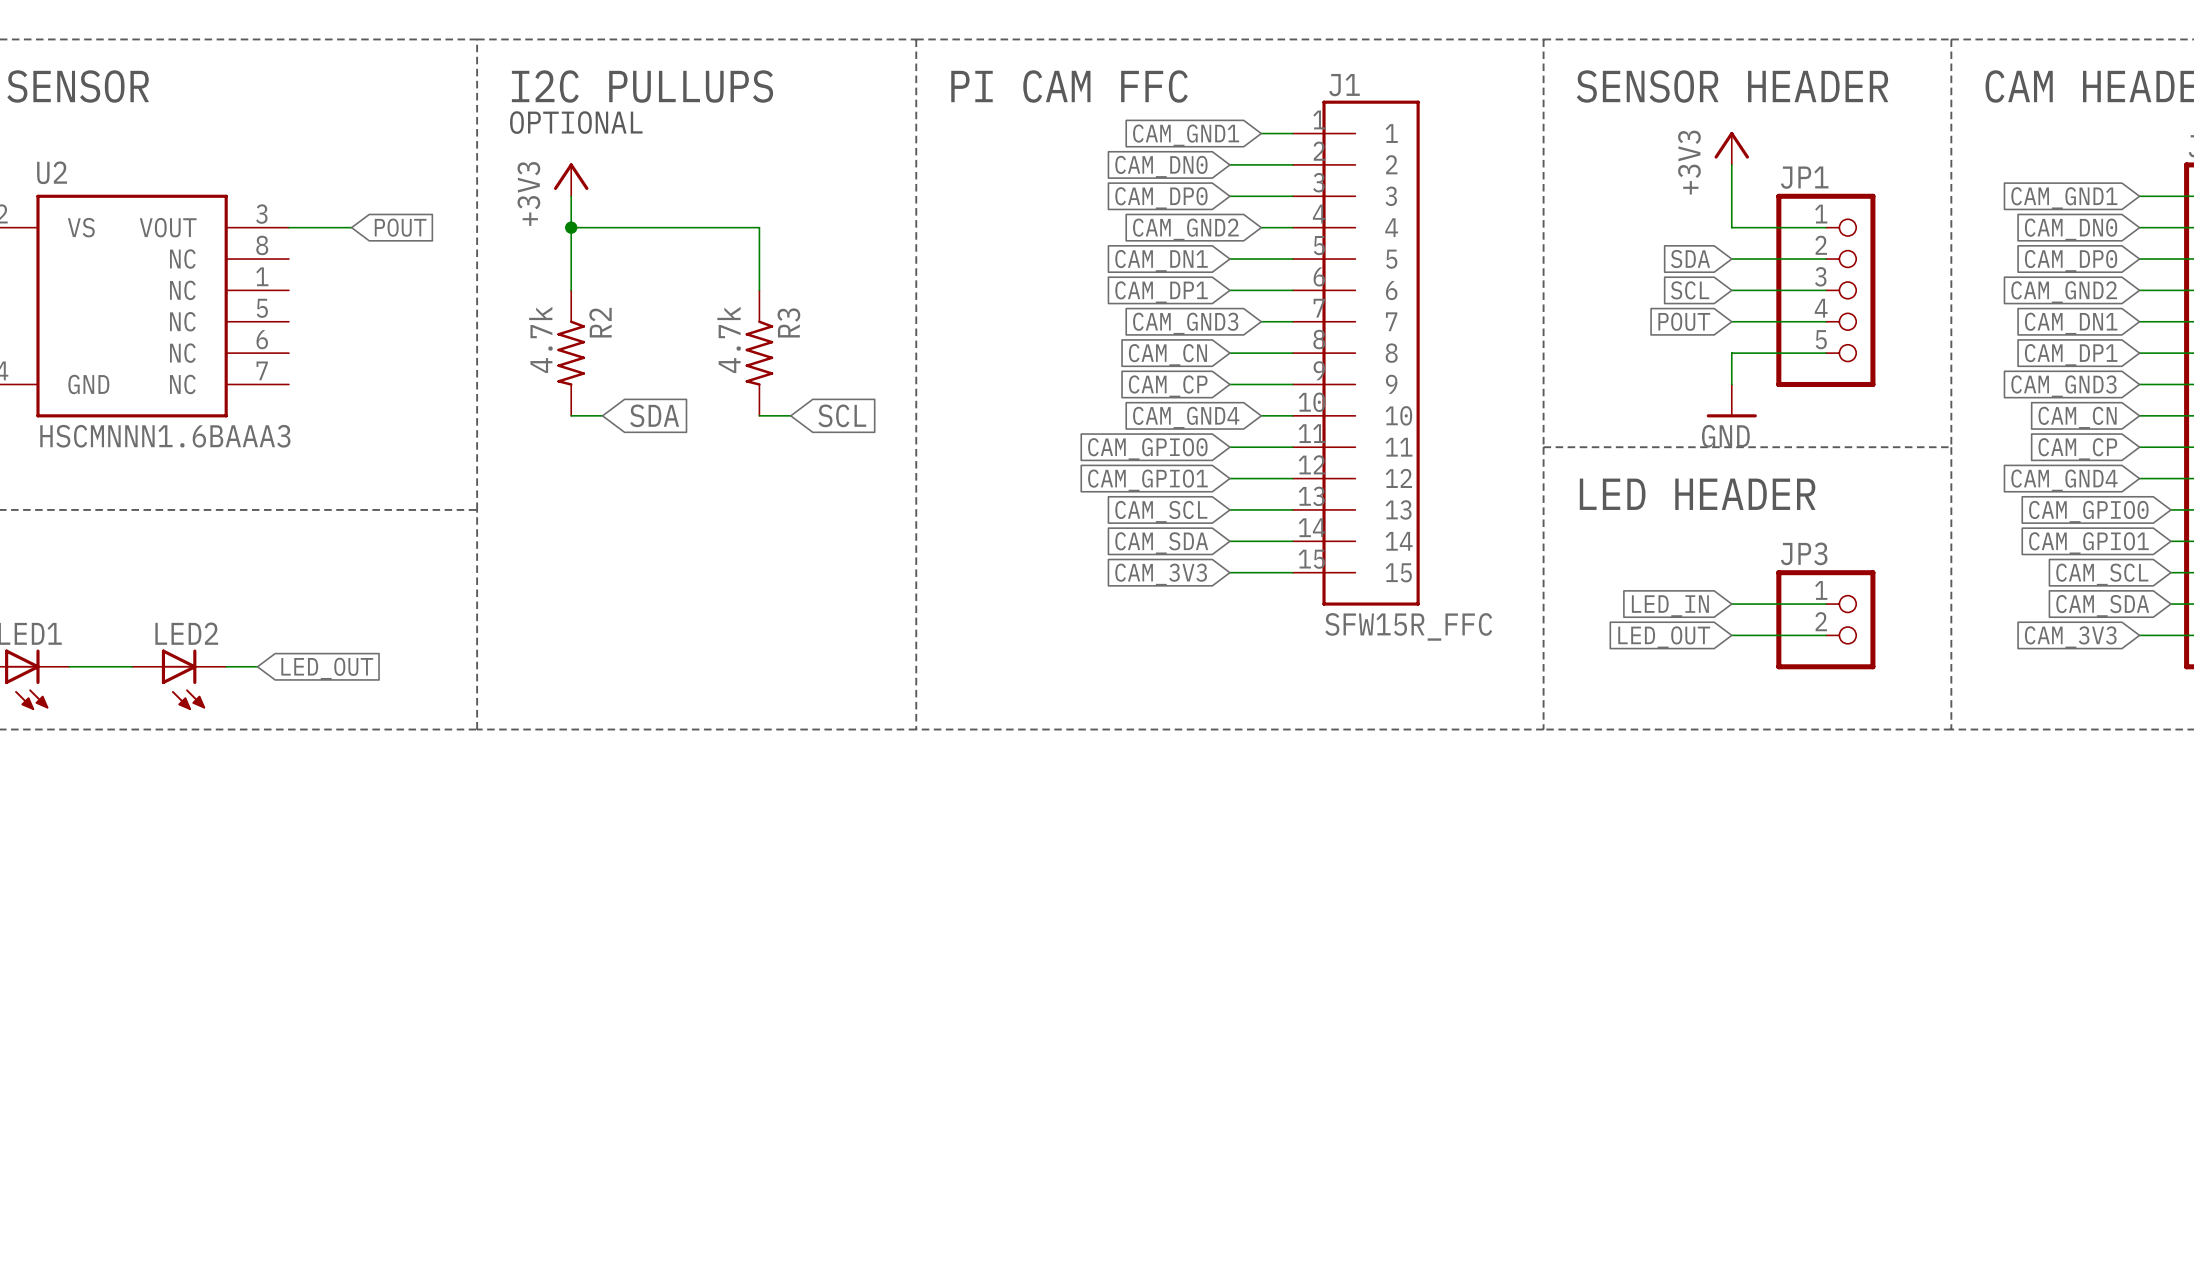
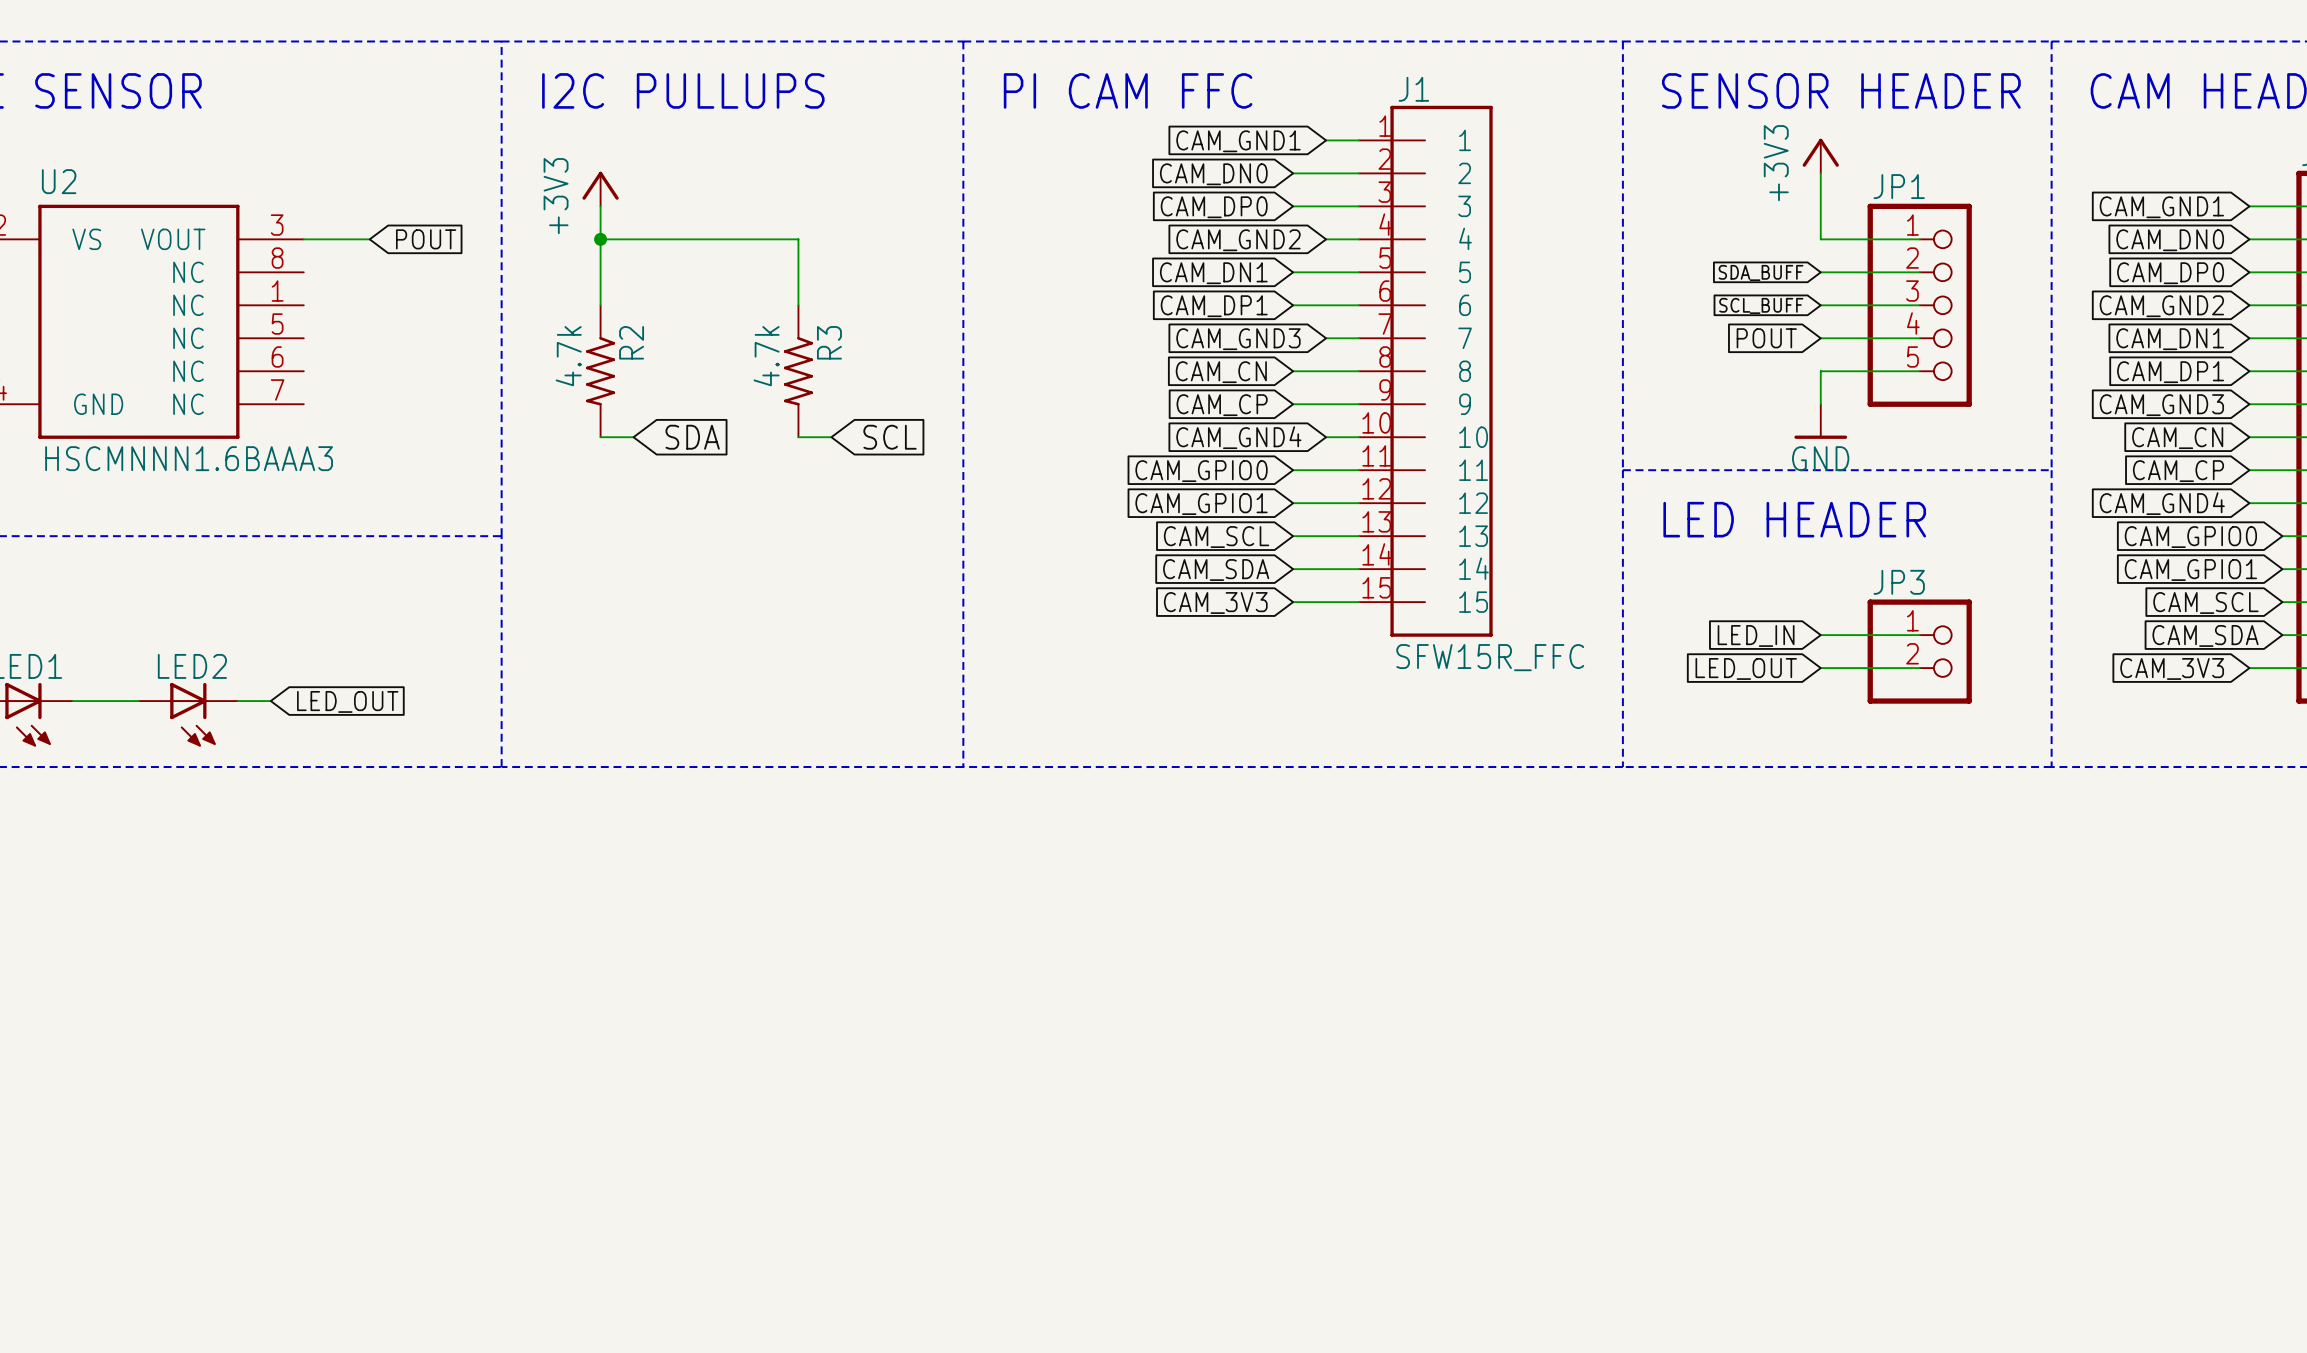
text: OPTIONAL (576, 122) -> none
global label: SDA (1690, 259) -> SDA_BUFF (1761, 272)
global label: SCL (1690, 290) -> SCL_BUFF (1761, 305)

